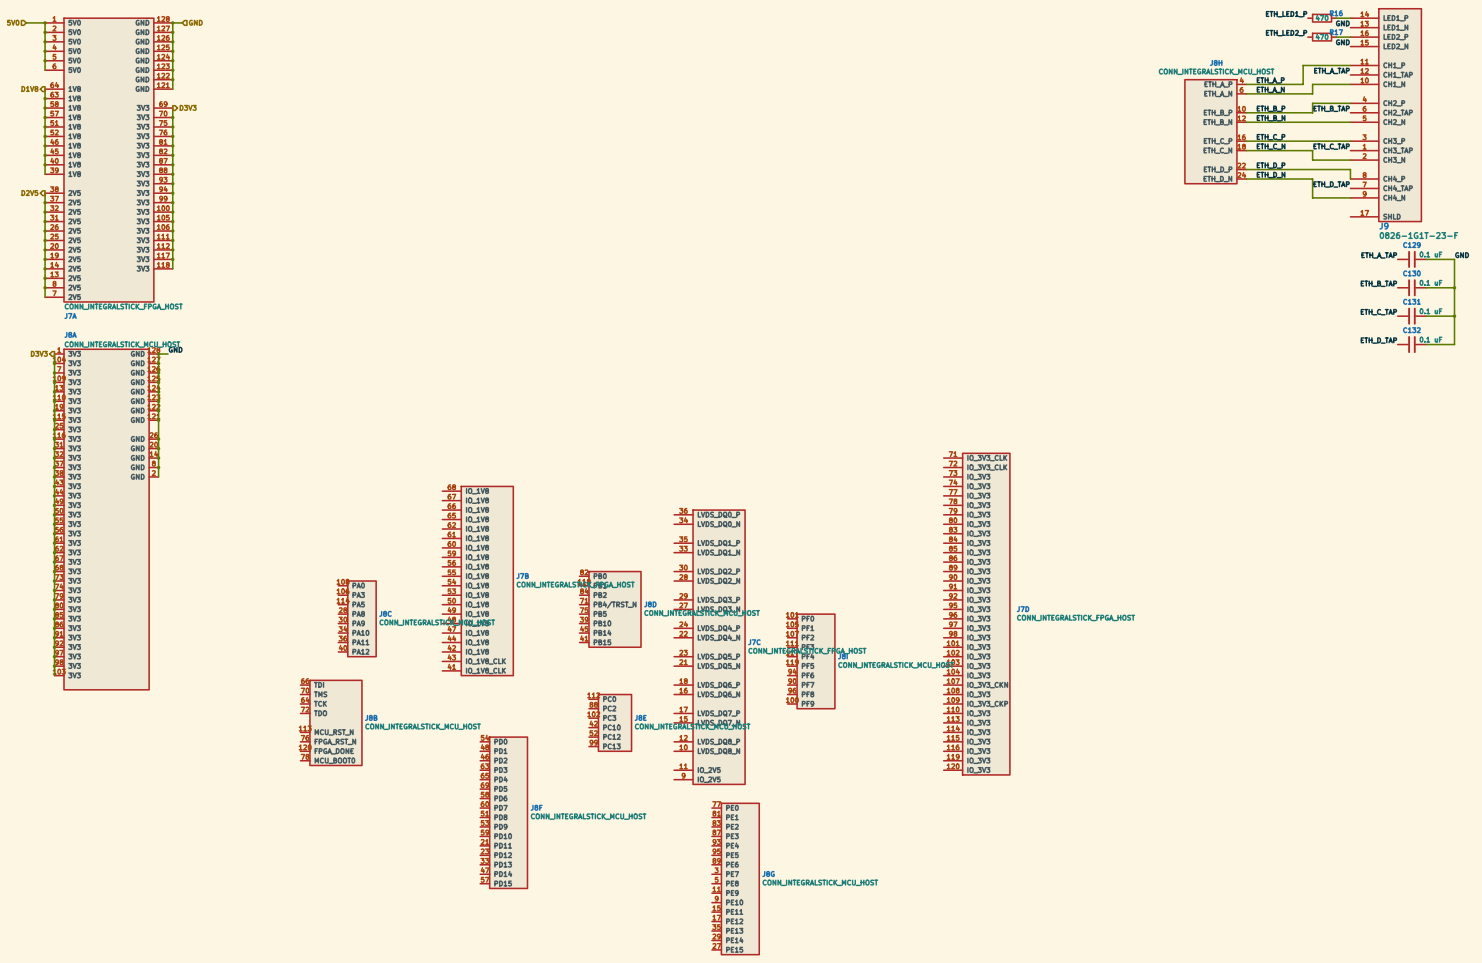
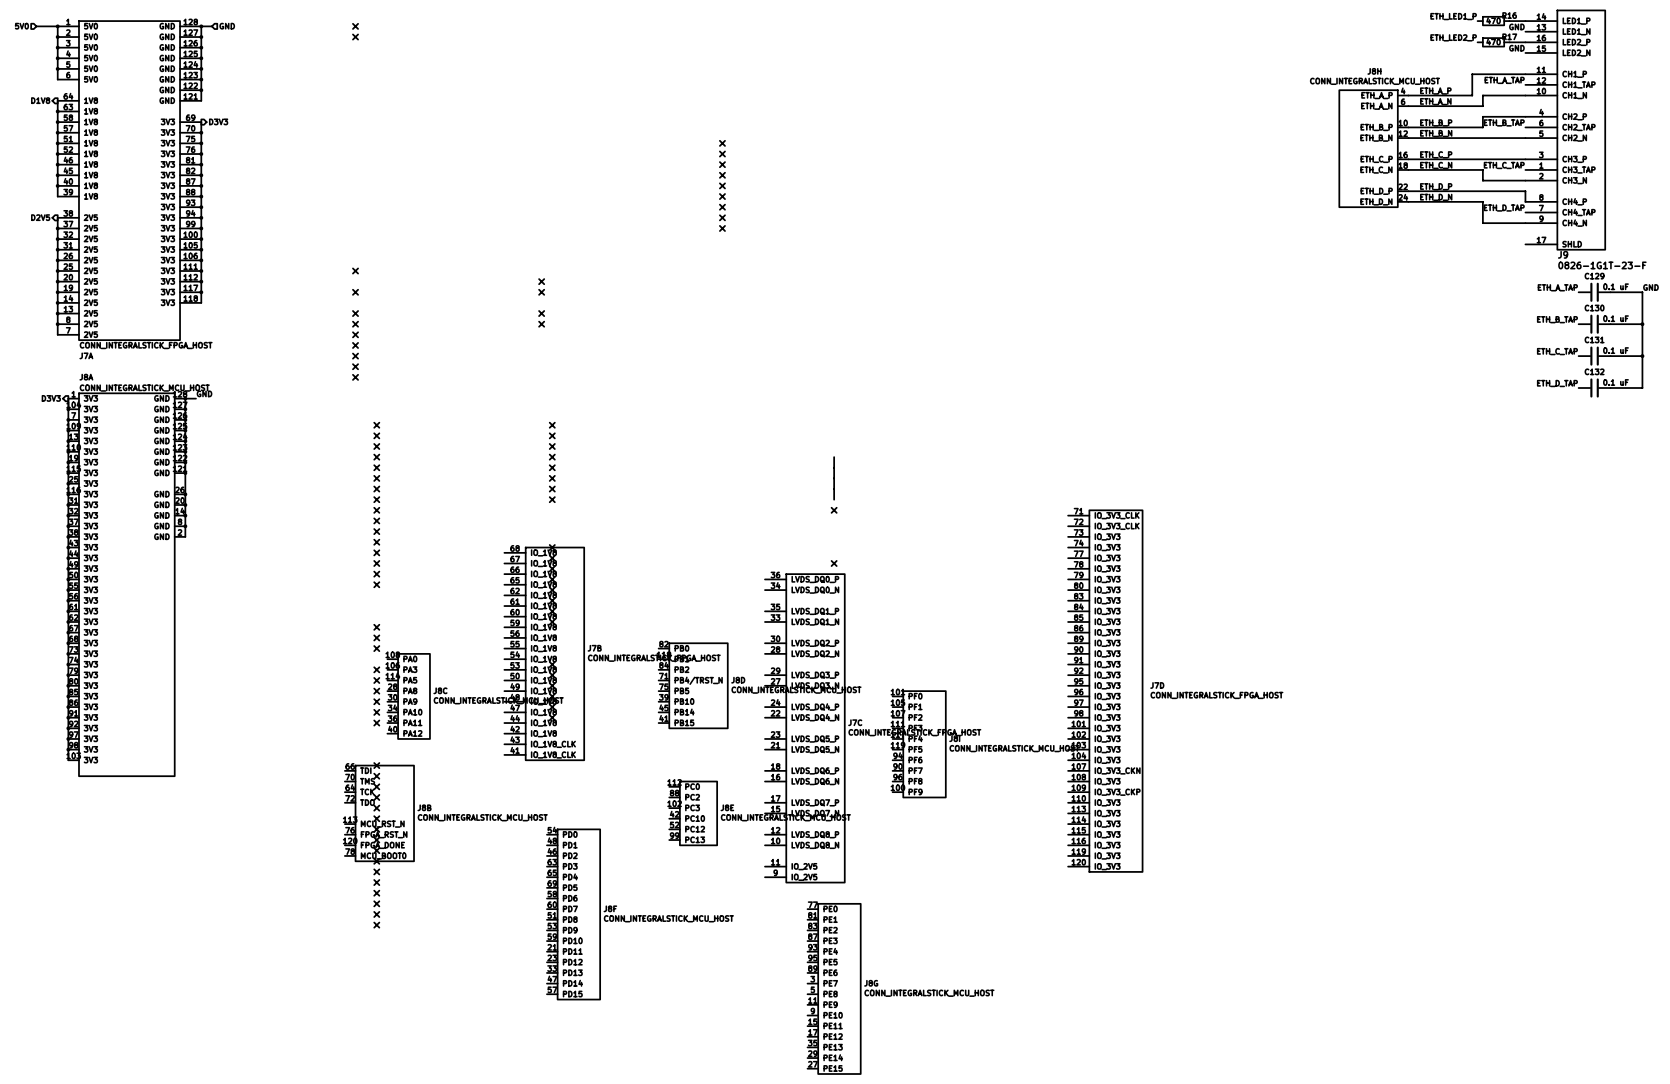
no-connect mark: none -> (355, 26)
no-connect mark: none -> (355, 37)
no-connect mark: none -> (722, 143)
no-connect mark: none -> (722, 154)
no-connect mark: none -> (722, 164)
no-connect mark: none -> (722, 175)
no-connect mark: none -> (722, 185)
no-connect mark: none -> (722, 196)
no-connect mark: none -> (722, 207)
no-connect mark: none -> (722, 217)
no-connect mark: none -> (722, 228)
no-connect mark: none -> (355, 271)
no-connect mark: none -> (541, 281)
no-connect mark: none -> (355, 292)
no-connect mark: none -> (541, 292)
no-connect mark: none -> (355, 313)
no-connect mark: none -> (541, 313)
no-connect mark: none -> (355, 324)
no-connect mark: none -> (541, 324)
no-connect mark: none -> (355, 334)
no-connect mark: none -> (355, 345)
no-connect mark: none -> (355, 356)
no-connect mark: none -> (355, 366)
no-connect mark: none -> (355, 377)
no-connect mark: none -> (376, 425)
no-connect mark: none -> (552, 425)
no-connect mark: none -> (376, 435)
no-connect mark: none -> (552, 435)
no-connect mark: none -> (376, 446)
no-connect mark: none -> (552, 446)
no-connect mark: none -> (376, 457)
no-connect mark: none -> (552, 457)
wire: none -> (834, 457) (834, 499)
no-connect mark: none -> (376, 467)
no-connect mark: none -> (552, 467)
no-connect mark: none -> (376, 478)
no-connect mark: none -> (552, 478)
no-connect mark: none -> (376, 489)
no-connect mark: none -> (552, 489)
no-connect mark: none -> (376, 499)
no-connect mark: none -> (552, 499)
no-connect mark: none -> (376, 510)
no-connect mark: none -> (834, 510)
no-connect mark: none -> (376, 520)
no-connect mark: none -> (376, 531)
no-connect mark: none -> (376, 542)
no-connect mark: none -> (552, 547)
no-connect mark: none -> (376, 552)
no-connect mark: none -> (552, 558)
no-connect mark: none -> (376, 563)
no-connect mark: none -> (834, 563)
no-connect mark: none -> (552, 568)
no-connect mark: none -> (376, 574)
no-connect mark: none -> (552, 579)
no-connect mark: none -> (376, 584)
no-connect mark: none -> (552, 590)
no-connect mark: none -> (552, 600)
no-connect mark: none -> (552, 611)
no-connect mark: none -> (552, 621)
no-connect mark: none -> (376, 627)
no-connect mark: none -> (376, 637)
no-connect mark: none -> (376, 648)
no-connect mark: none -> (552, 664)
no-connect mark: none -> (376, 669)
no-connect mark: none -> (552, 675)
no-connect mark: none -> (376, 680)
no-connect mark: none -> (552, 685)
no-connect mark: none -> (376, 691)
no-connect mark: none -> (552, 696)
no-connect mark: none -> (376, 701)
no-connect mark: none -> (552, 707)
no-connect mark: none -> (376, 712)
no-connect mark: none -> (552, 717)
no-connect mark: none -> (376, 723)
no-connect mark: none -> (376, 765)
no-connect mark: none -> (376, 776)
no-connect mark: none -> (376, 786)
no-connect mark: none -> (376, 797)
no-connect mark: none -> (376, 808)
no-connect mark: none -> (376, 818)
no-connect mark: none -> (376, 829)
no-connect mark: none -> (376, 840)
no-connect mark: none -> (376, 850)
no-connect mark: none -> (376, 861)
no-connect mark: none -> (376, 871)
no-connect mark: none -> (376, 882)
no-connect mark: none -> (376, 893)
no-connect mark: none -> (376, 903)
no-connect mark: none -> (376, 914)
no-connect mark: none -> (376, 925)

